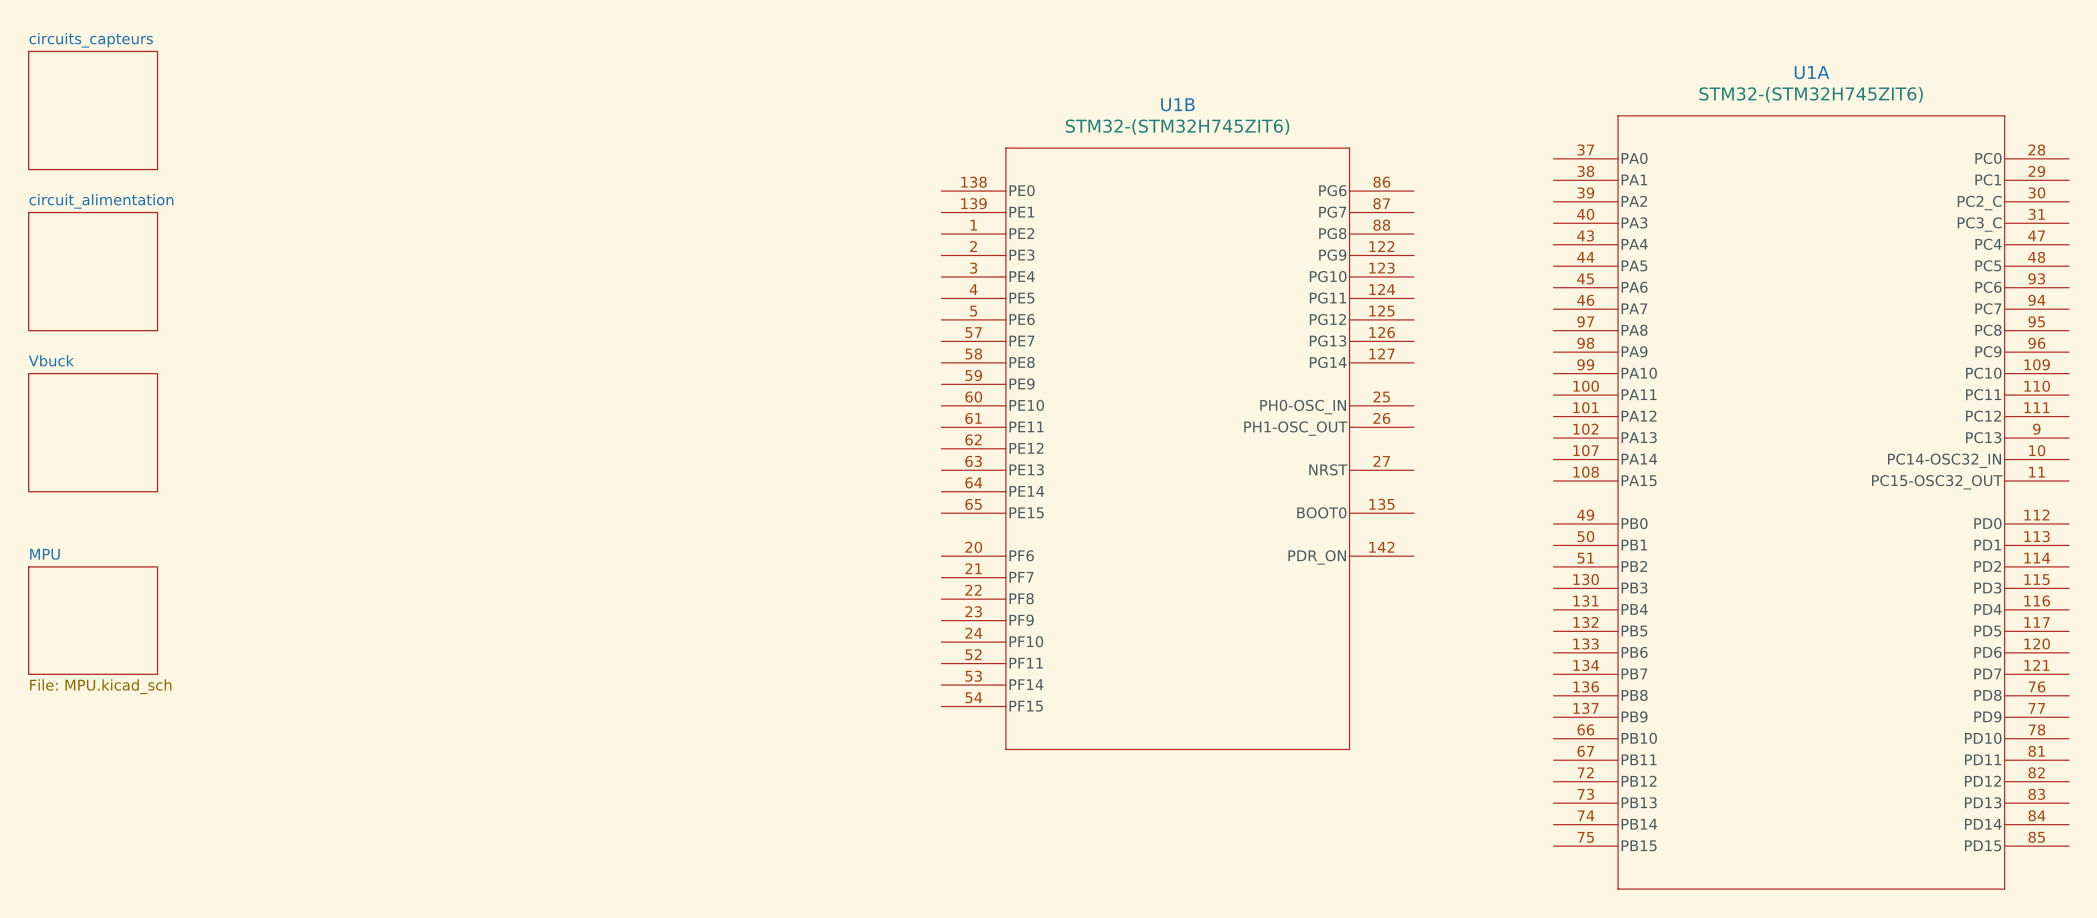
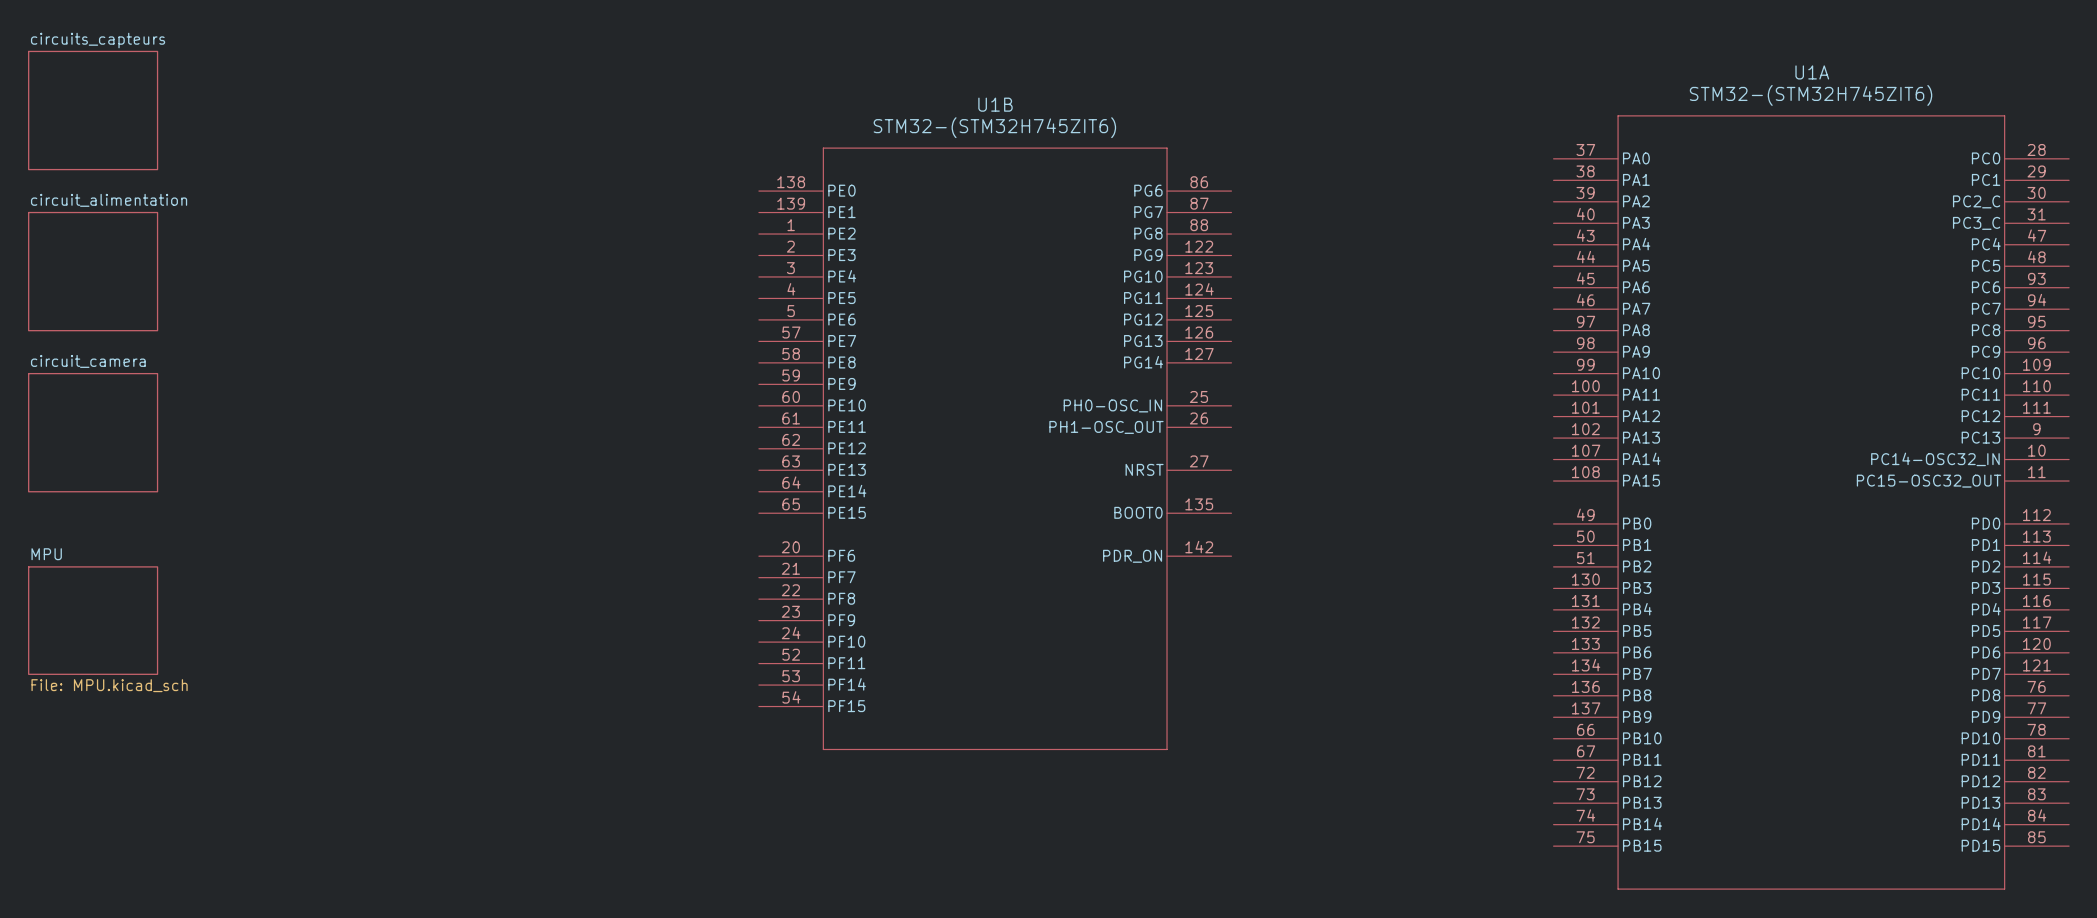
sheet Vbuck name: Vbuck (51, 360) -> circuit_camera (88, 361)
U1B position: (1177, 448) -> (995, 448)

